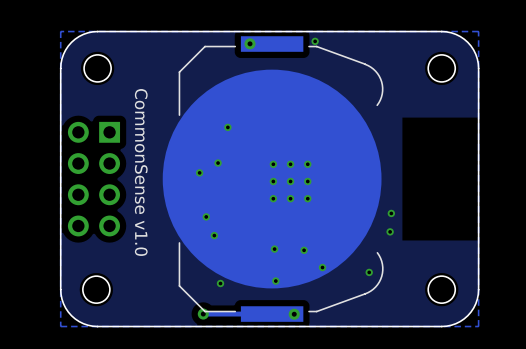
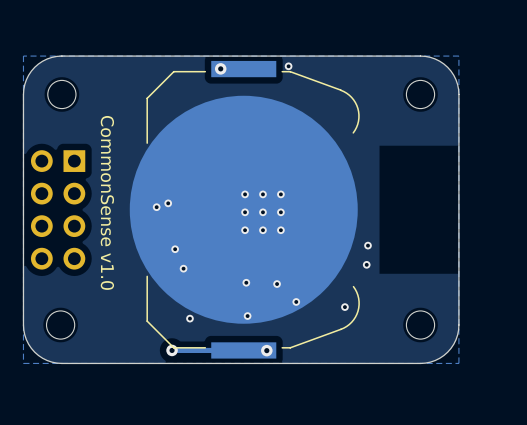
via: (227, 127) -> none
via: (218, 163) -> none
via: none -> (156, 207)

